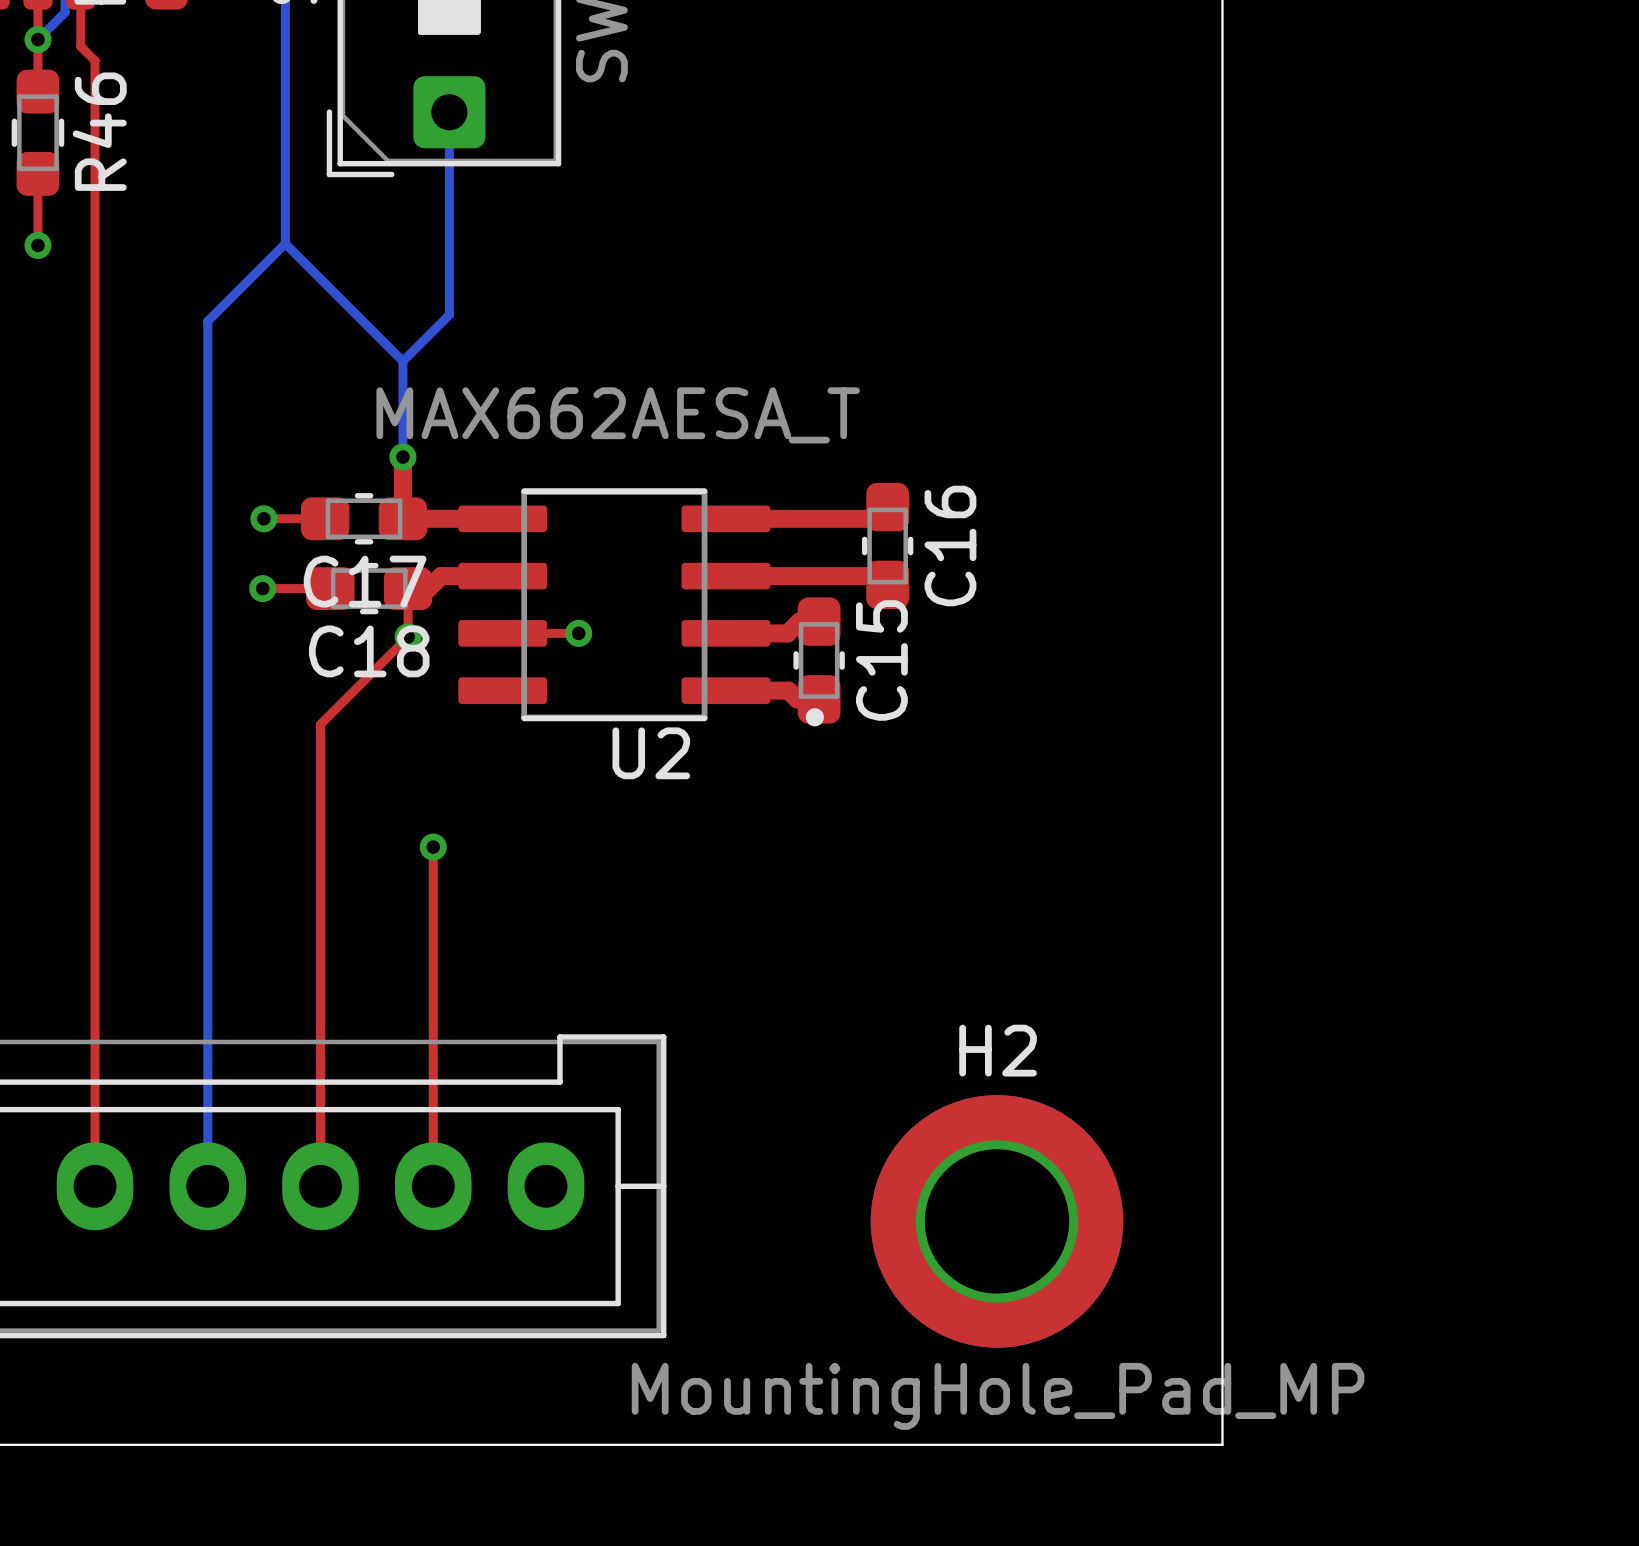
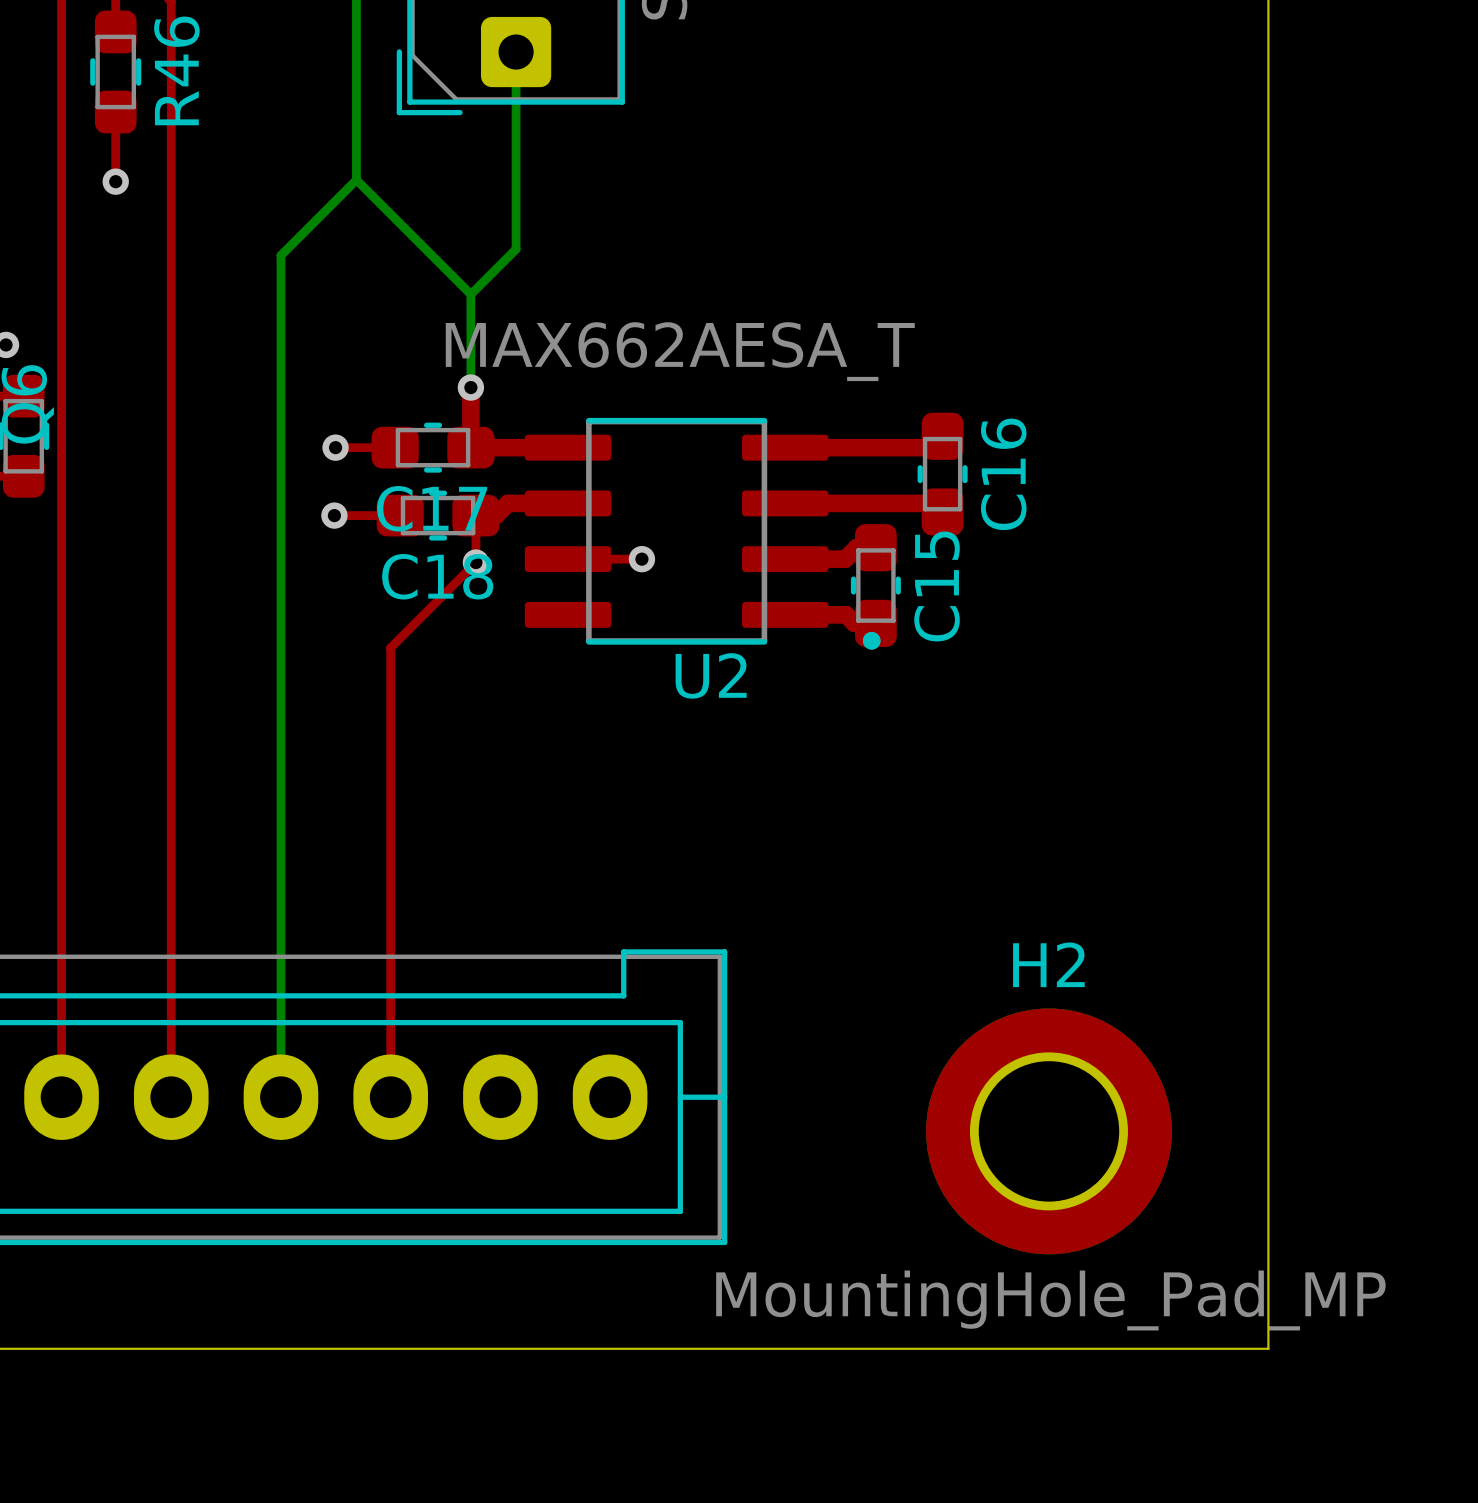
top track: (433, 847) (433, 1186) -> none
via: (433, 847) -> none

